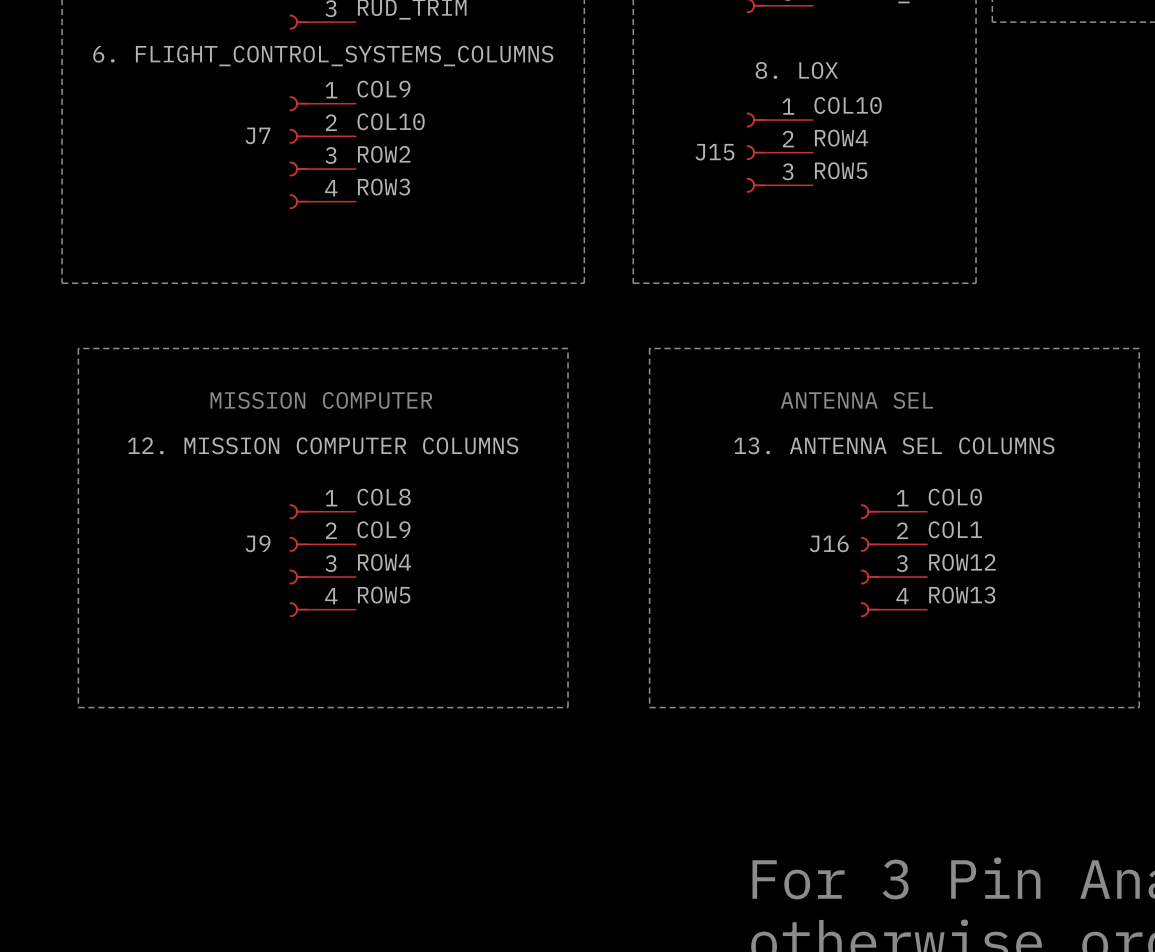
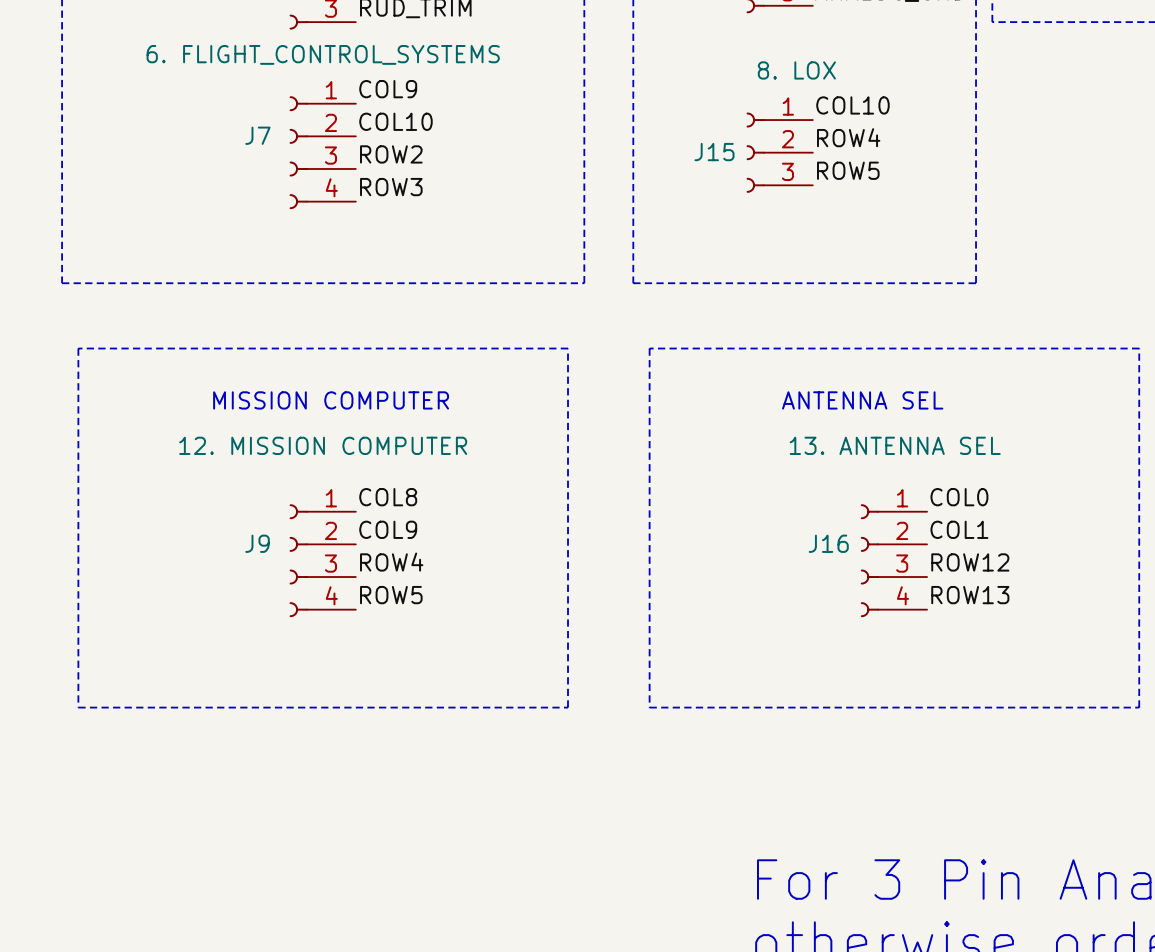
J7 value: 6. FLIGHT_CONTROL_SYSTEMS_COLUMNS (323, 55) -> 6. FLIGHT_CONTROL_SYSTEMS (323, 54)
J9 value: 12. MISSION COMPUTER COLUMNS (323, 445) -> 12. MISSION COMPUTER (323, 445)
J16 value: 13. ANTENNA SEL COLUMNS (894, 445) -> 13. ANTENNA SEL (895, 445)

